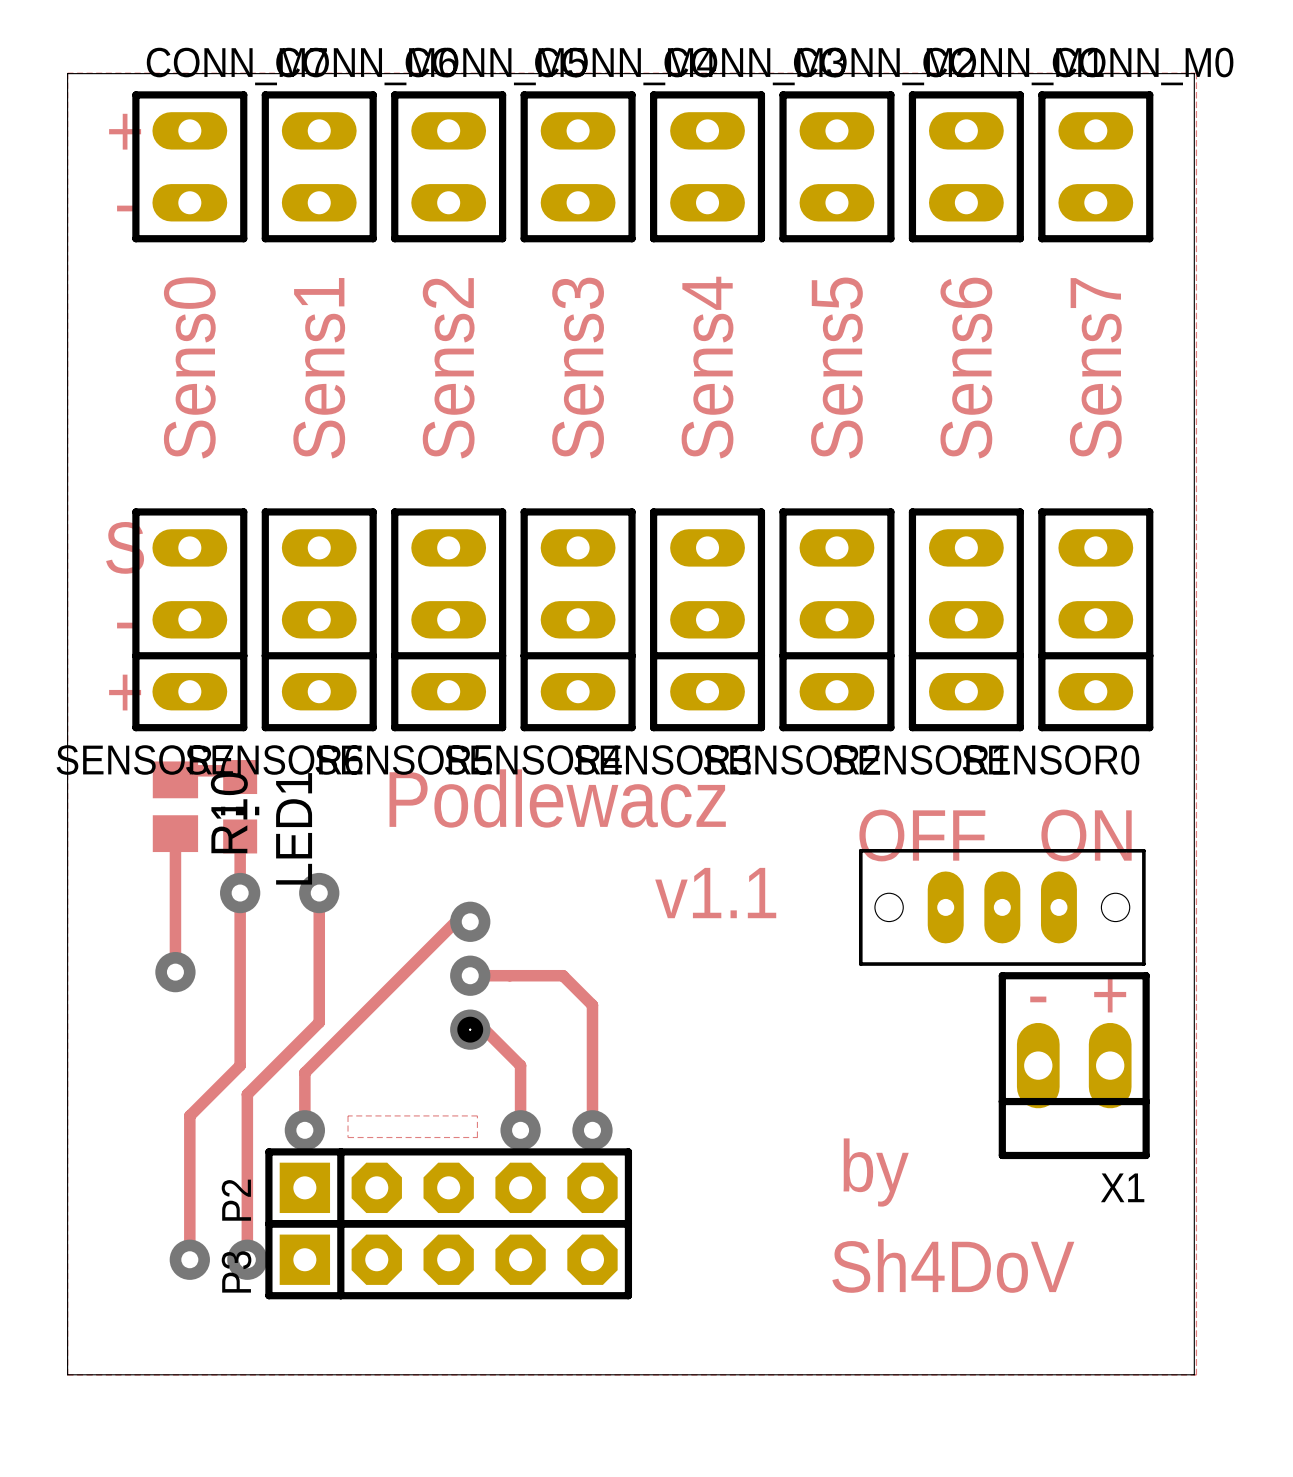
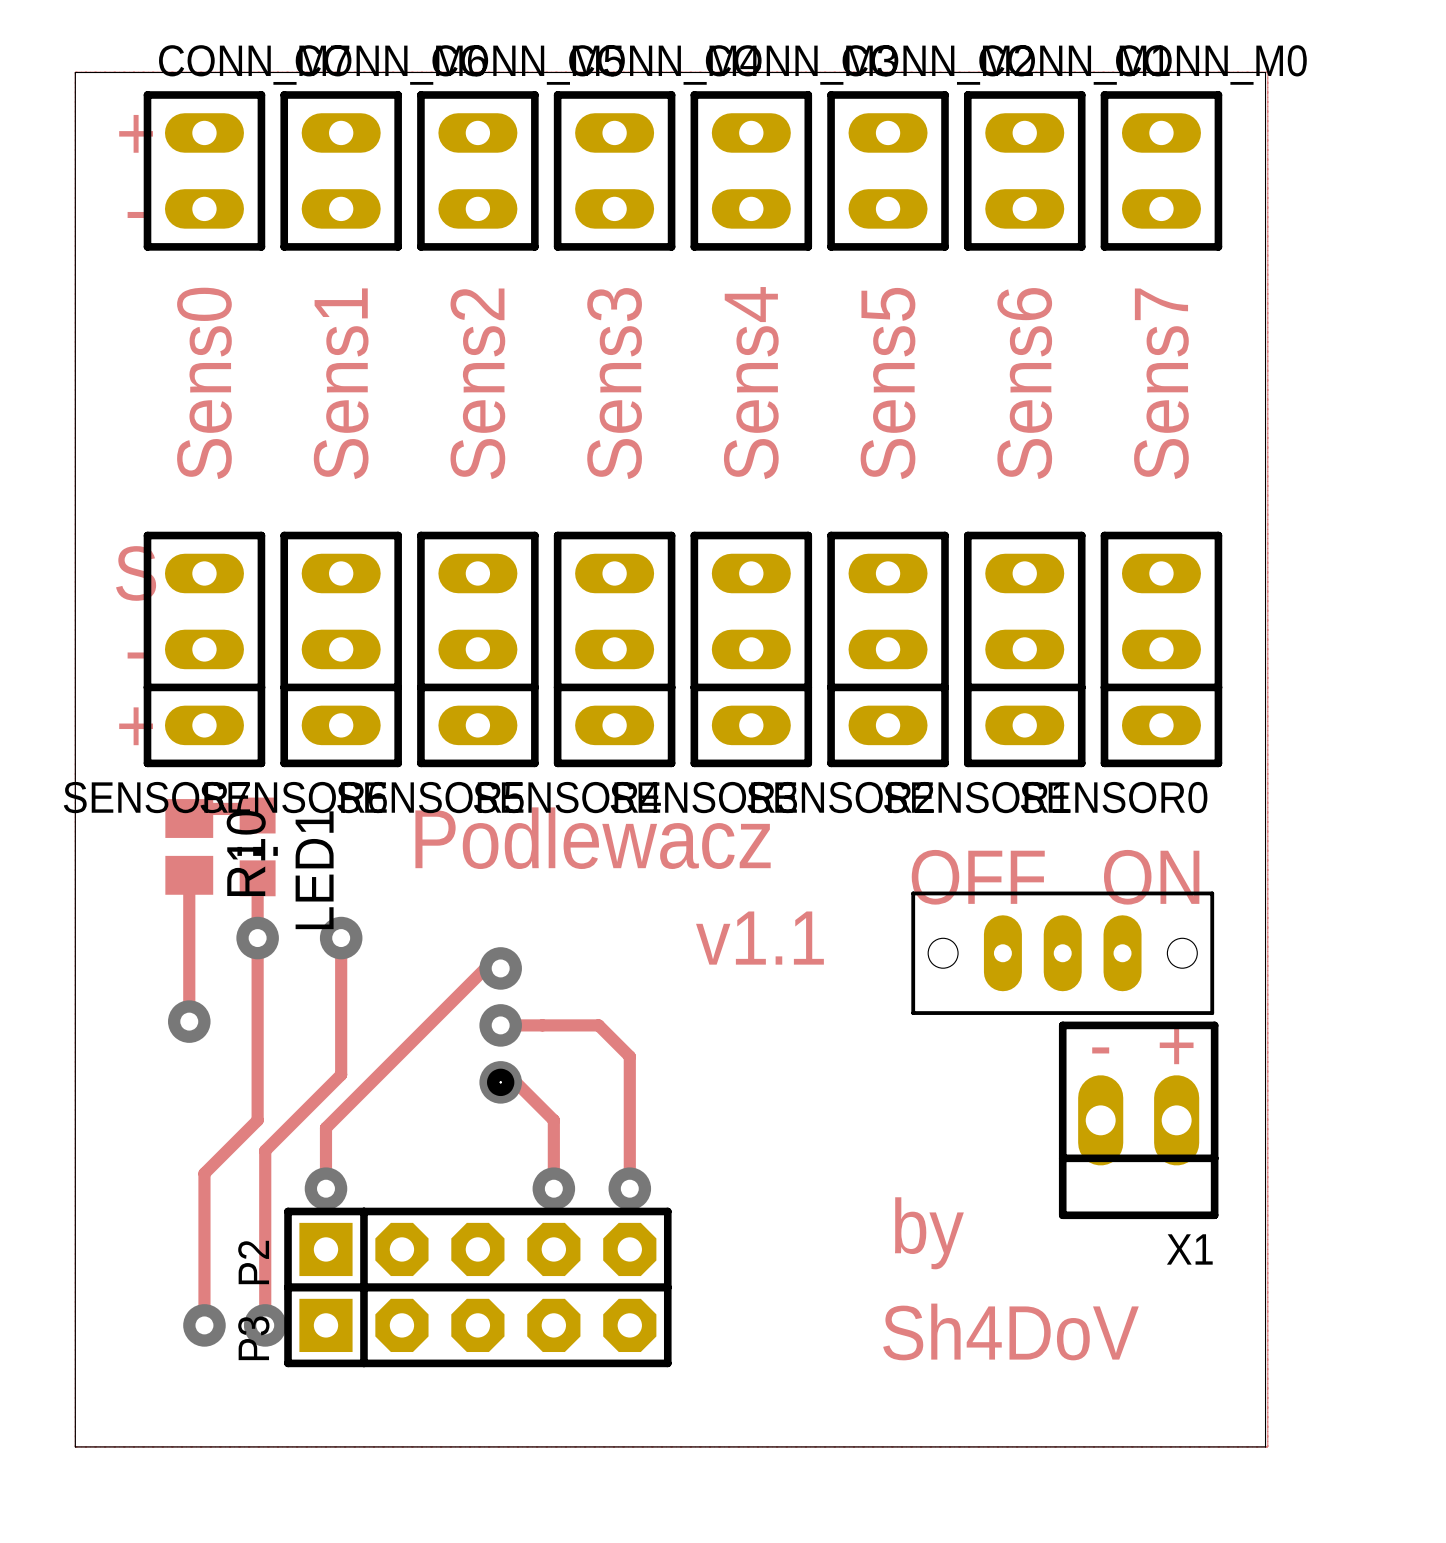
zone outline: (348, 1115) (477, 1115) (477, 1137) (348, 1137) (348, 1115) -> none

